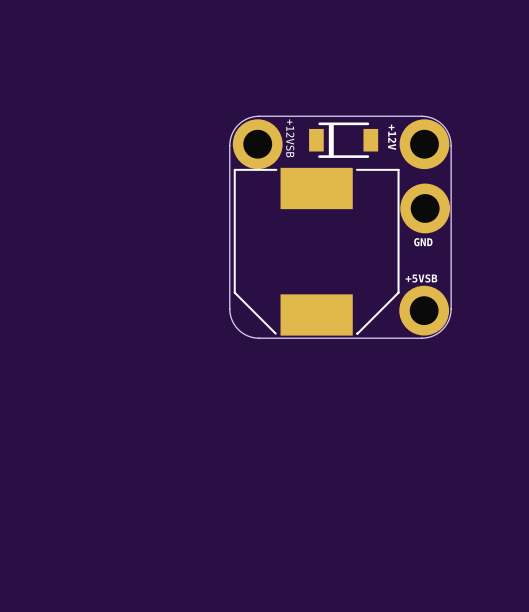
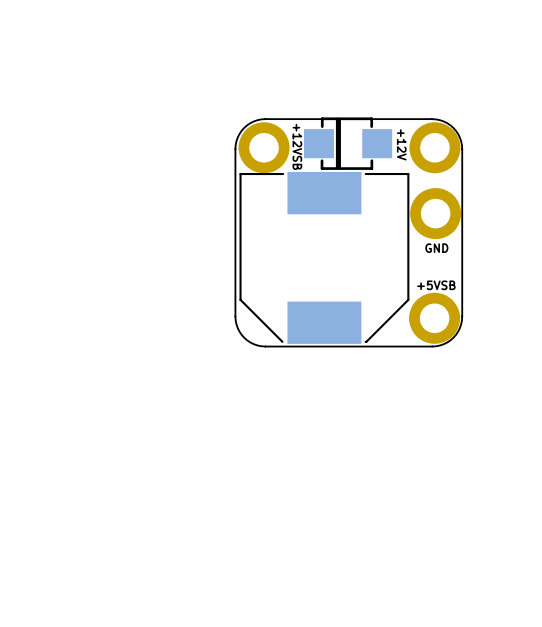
part footprint: [309, 122, 379, 158] -> [304, 117, 393, 170]

